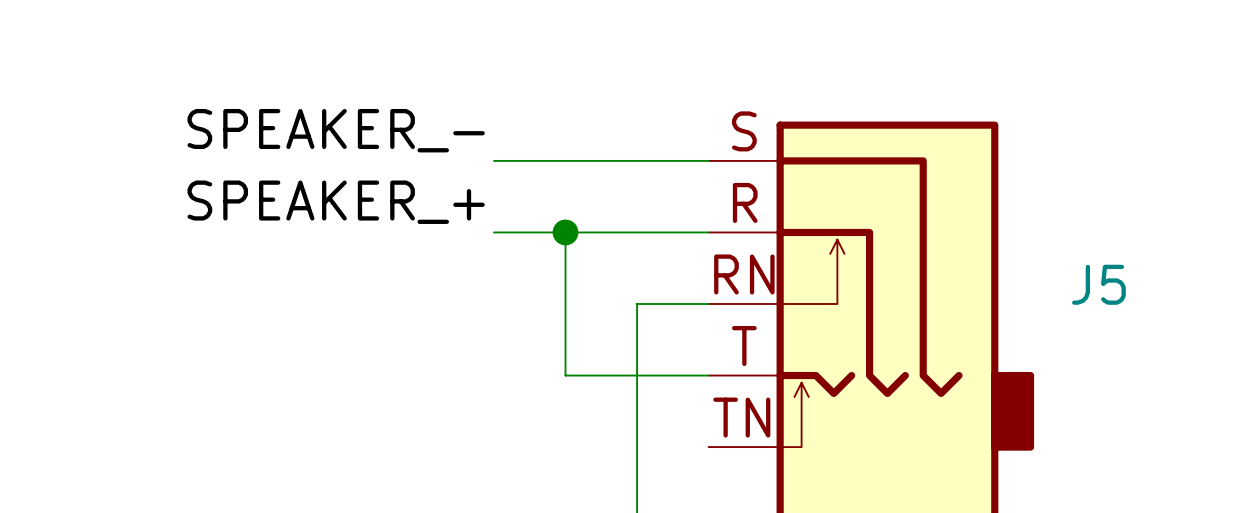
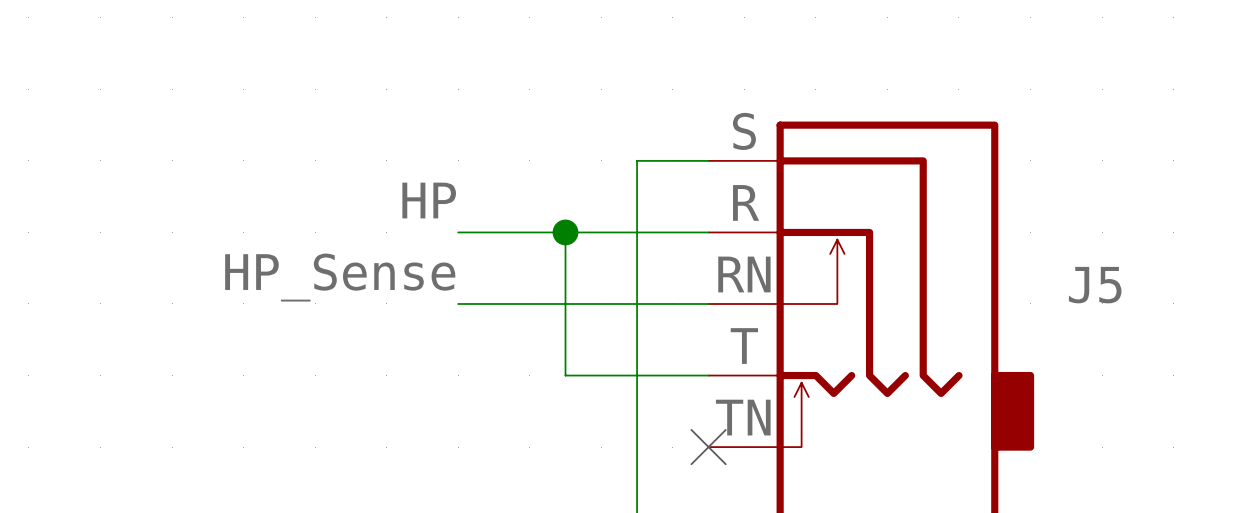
label: SPEAKER_- (336, 130) -> none
wire: (493, 160) (637, 160) -> (458, 303) (637, 303) (637, 160)
label: none -> HP (429, 200)
label: SPEAKER_+ (336, 202) -> none
wire: none -> (458, 232) (493, 232)
label: none -> HP_Sense (340, 277)
no-connect mark: none -> (708, 447)

